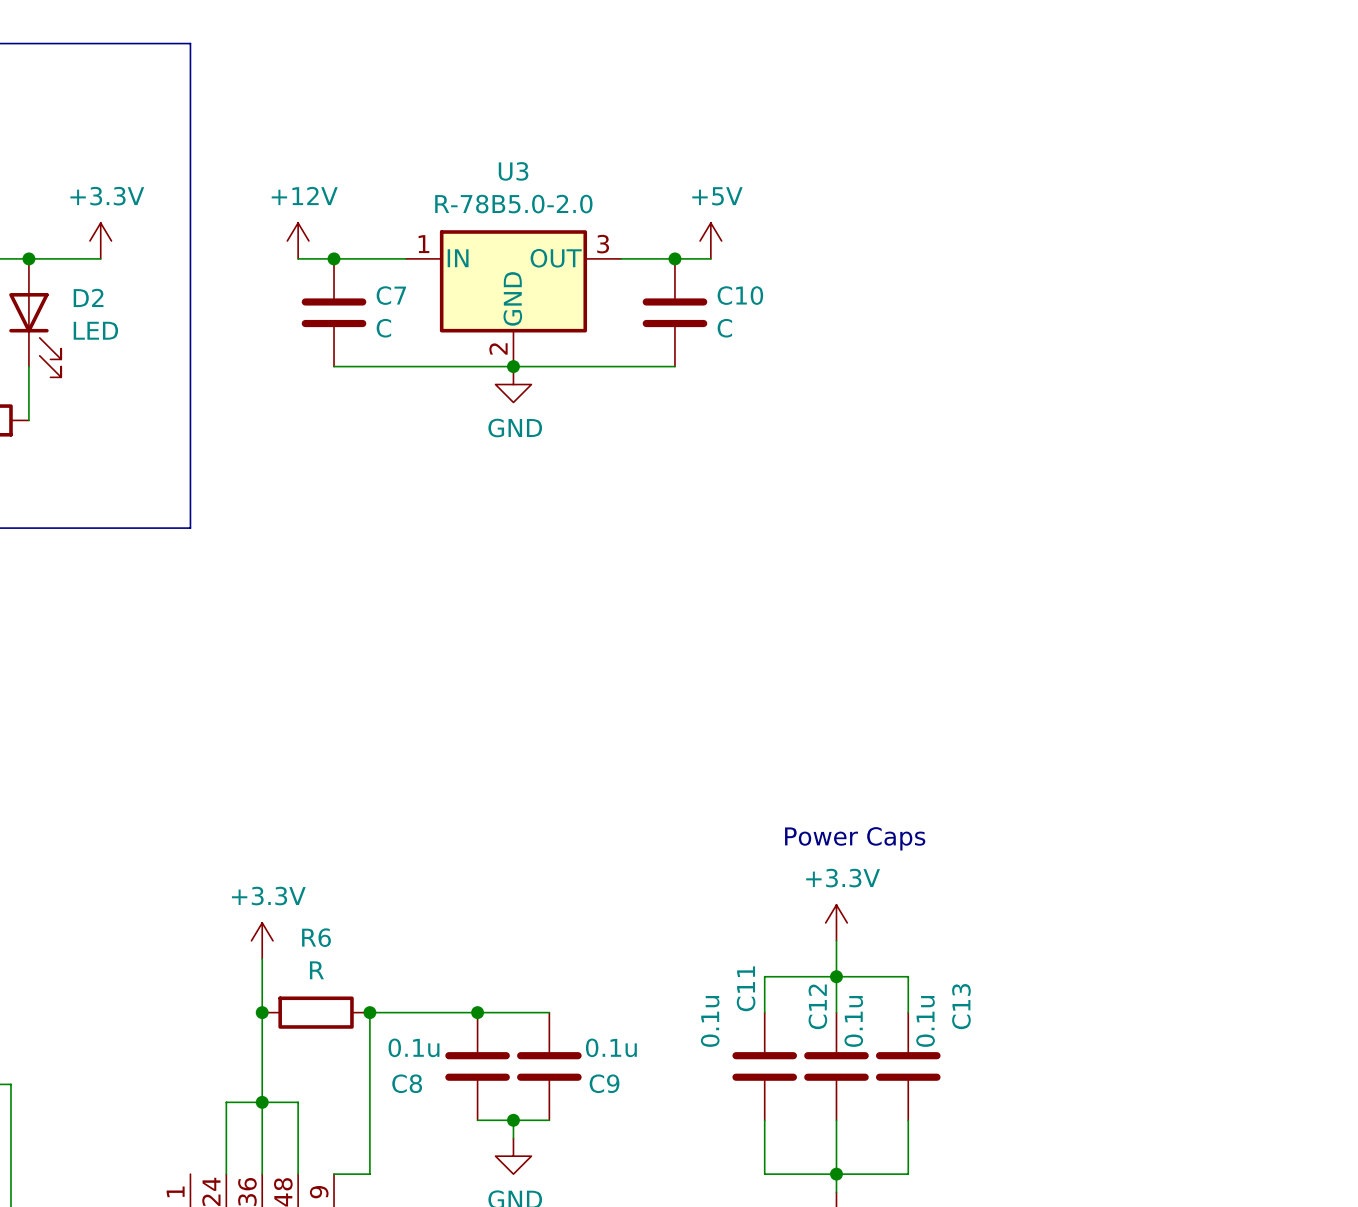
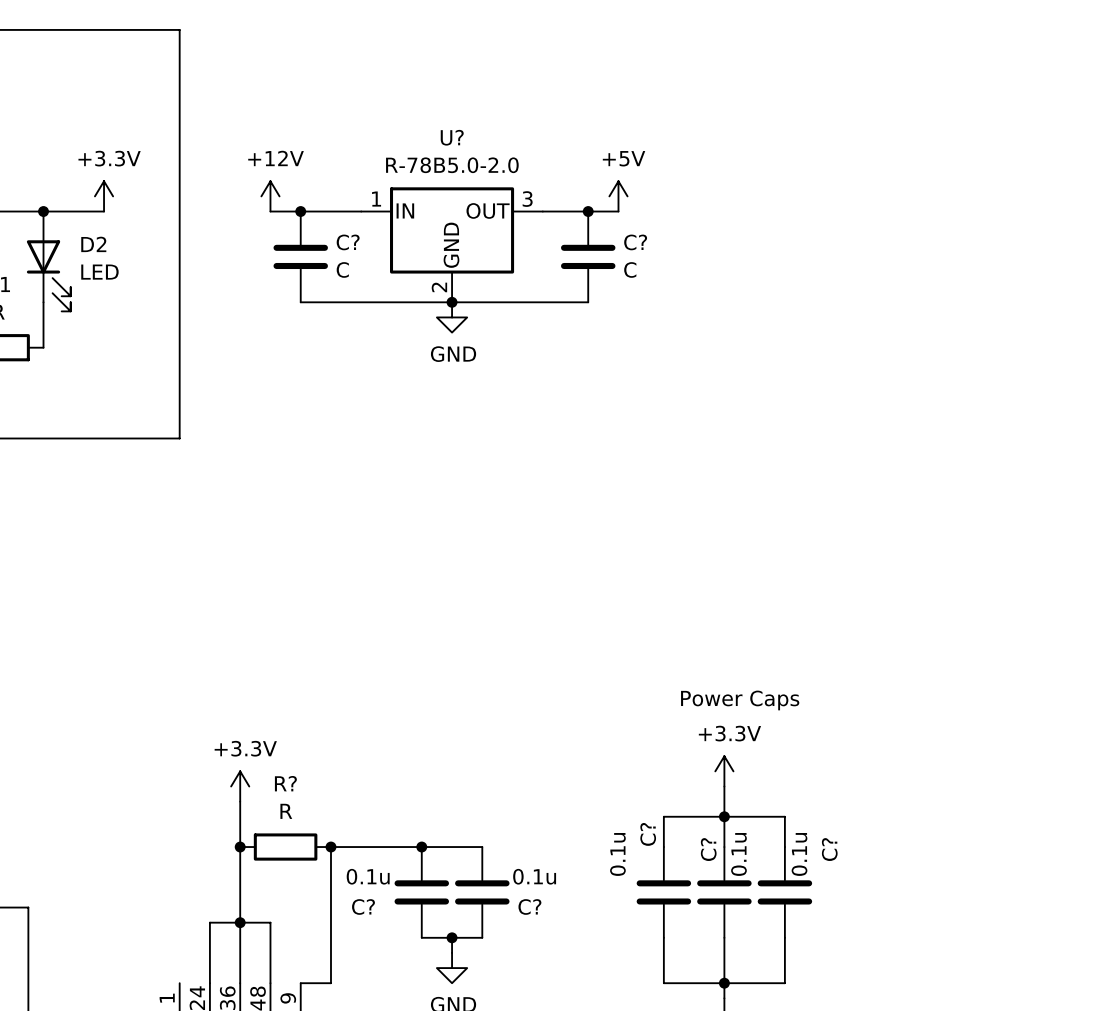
U3 name: U3 (513, 171) -> U? (452, 137)
C7 name: C7 (391, 295) -> C? (348, 242)
C10 name: C10 (740, 295) -> C? (635, 242)
R6 name: R6 (316, 937) -> R? (285, 783)
C11 name: C11 (746, 988) -> C? (648, 834)
C12 name: C12 (817, 1006) -> C? (708, 849)
C13 name: C13 (961, 1006) -> C? (829, 849)
C8 name: C8 (407, 1083) -> C? (363, 906)
C9 name: C9 (604, 1083) -> C? (529, 906)

